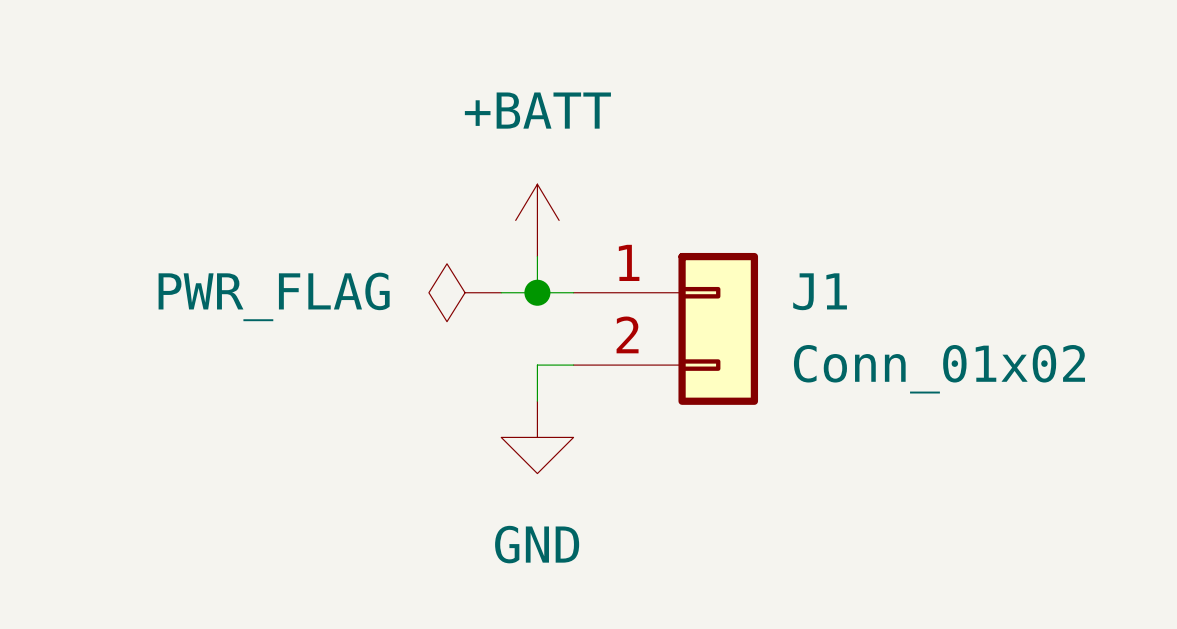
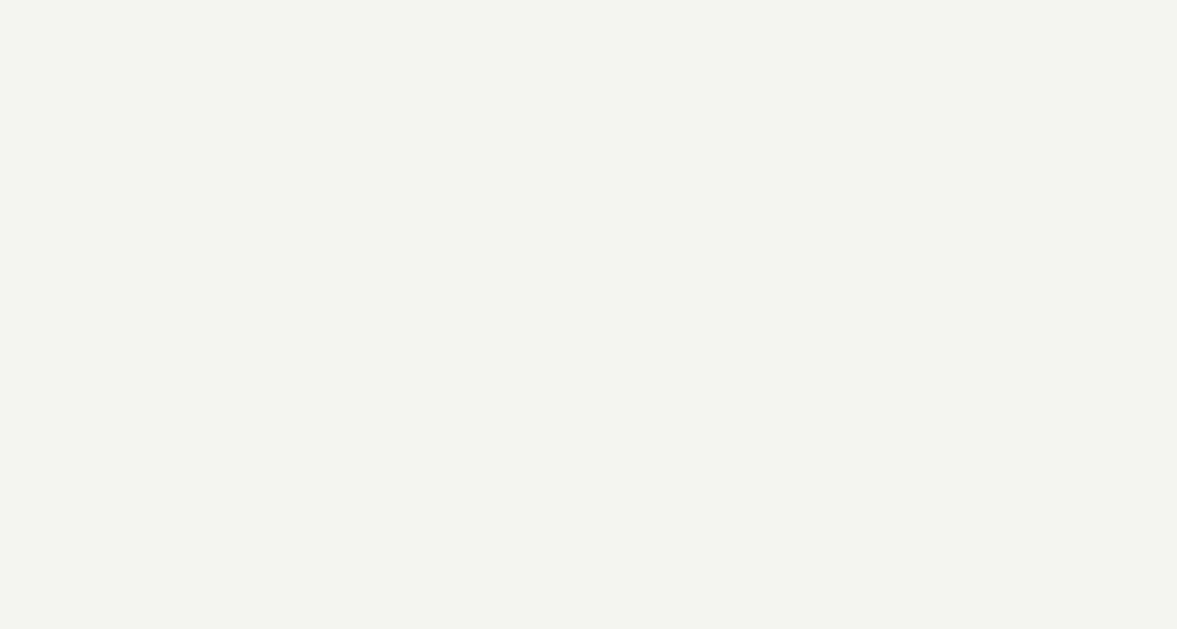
power symbol: +BATT (537, 220) -> none
wire: (537, 256) (537, 292) -> none
power symbol: PWR_FLAG (465, 292) -> none
wire: (501, 292) (573, 292) -> none
junction: (537, 292) -> none
J1: Conn_01x02 (665, 328) -> none
wire: (573, 365) (537, 365) (537, 401) -> none
power symbol: GND (537, 437) -> none

